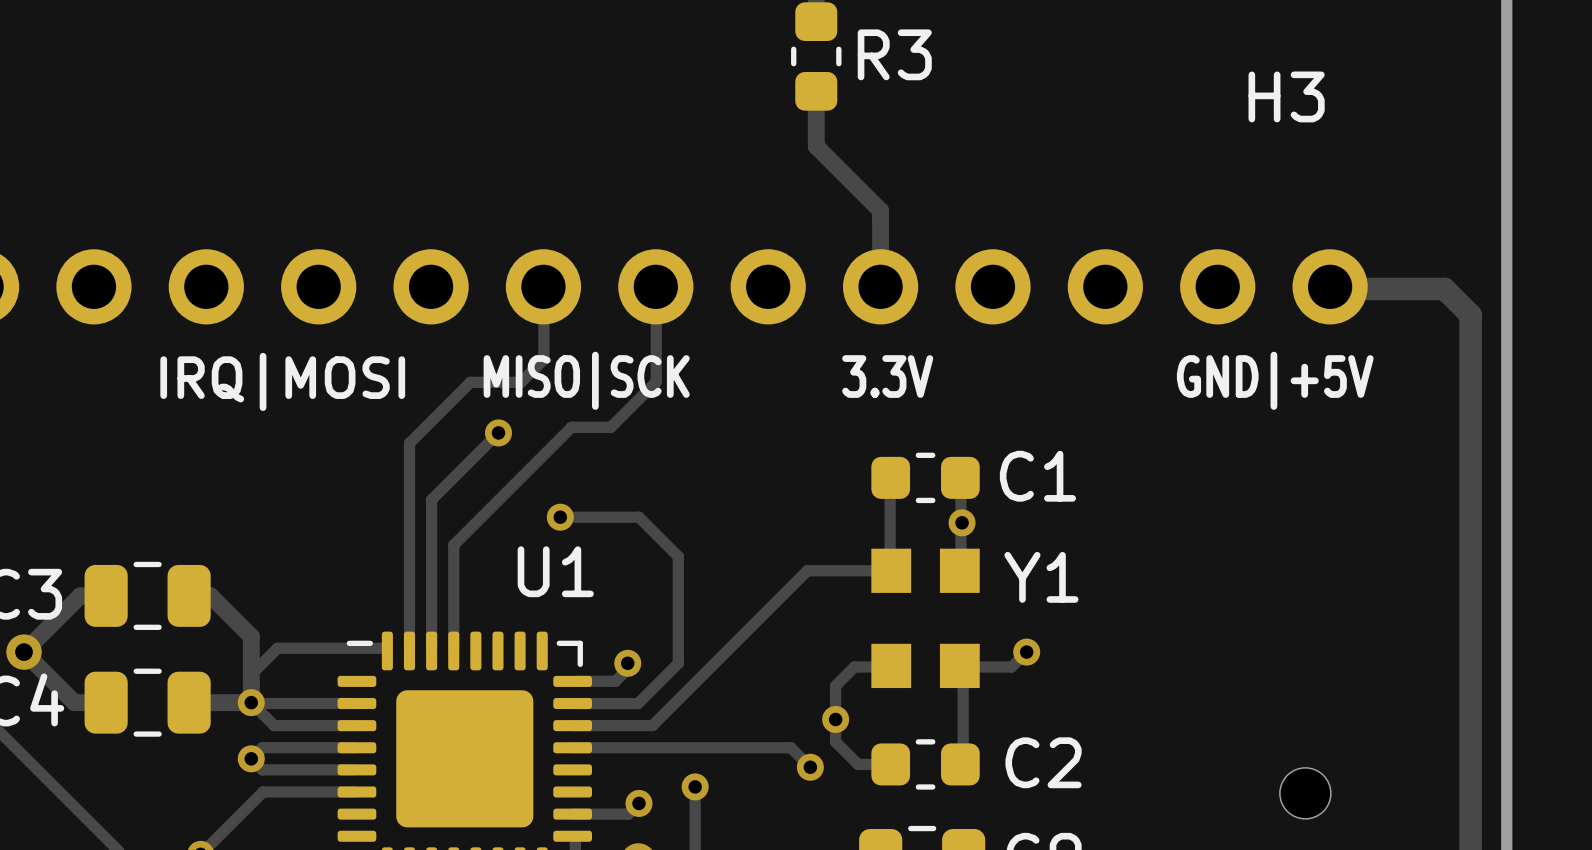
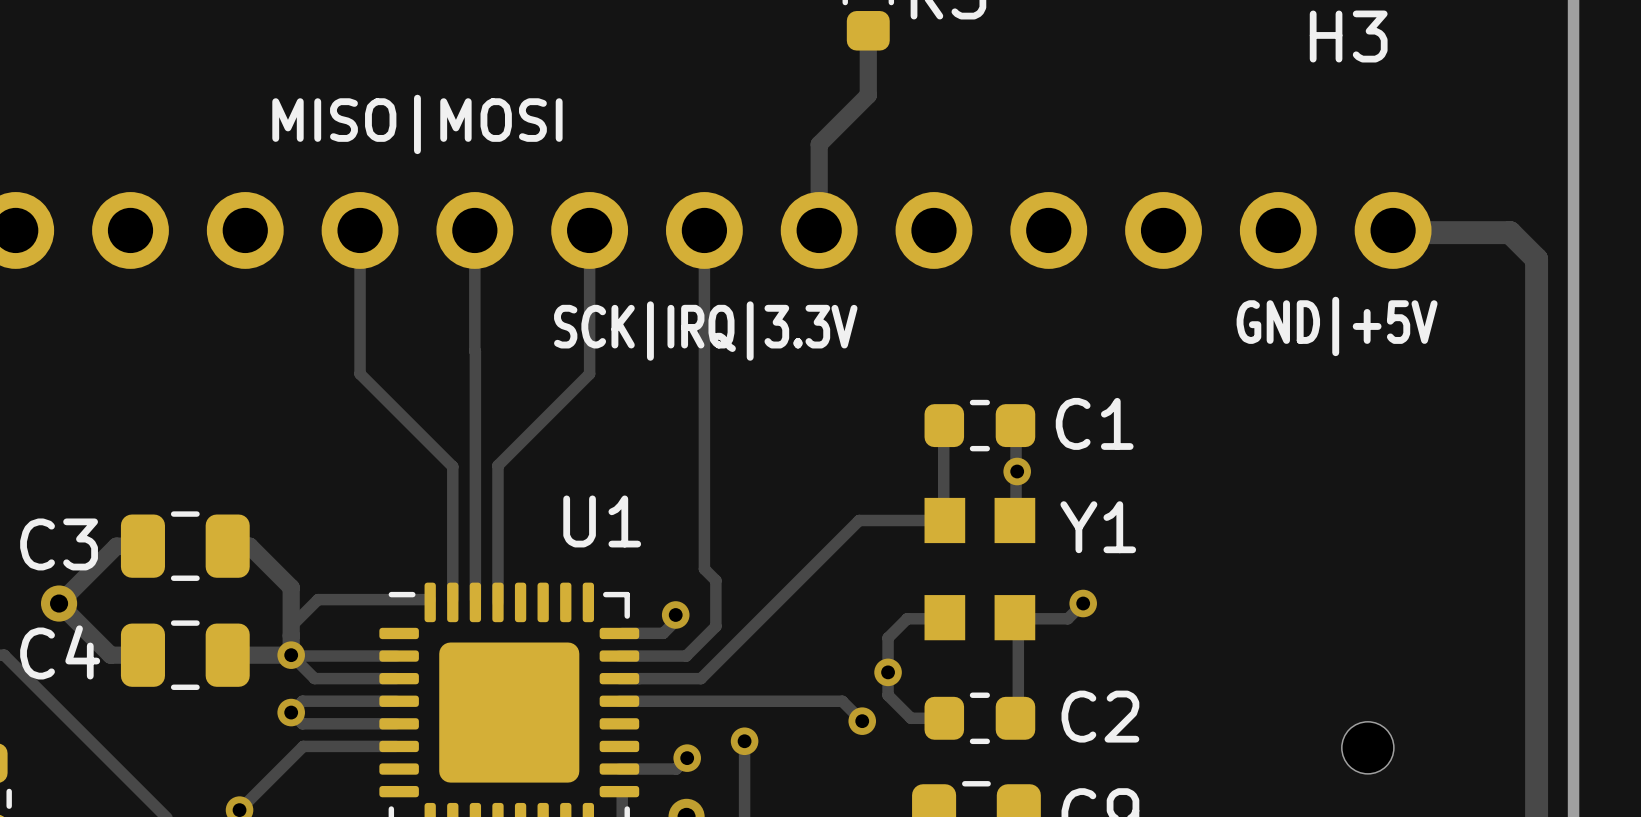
track: (816, 146) (880, 210) (880, 286) -> (868, 87) (868, 95) (819, 144) (819, 230)
text: none -> MISO|MOSI (417, 124)
track: none -> (474, 230) (474, 350)
track: none -> (589, 230) (589, 373) (497, 465) (497, 602)
track: (543, 288) (543, 359) (520, 382) (470, 382) (409, 443) (409, 518) -> (360, 230) (360, 373) (452, 466)
track: (656, 288) (656, 381) (610, 427) (571, 427) (453, 545) (453, 648) -> none
text: MISO|SCK 3.3V (708, 380) -> none
text: IRQ|MOSI (282, 381) -> none
text: none -> SCK|IRQ|3.3V (705, 331)
track: (498, 432) (431, 499) -> (475, 351) (475, 448)
via: (498, 432) -> none
track: (560, 517) (638, 517) (678, 556) (678, 663) (667, 674) -> (704, 230) (704, 569) (715, 580) (715, 626)
via: (560, 517) -> none

